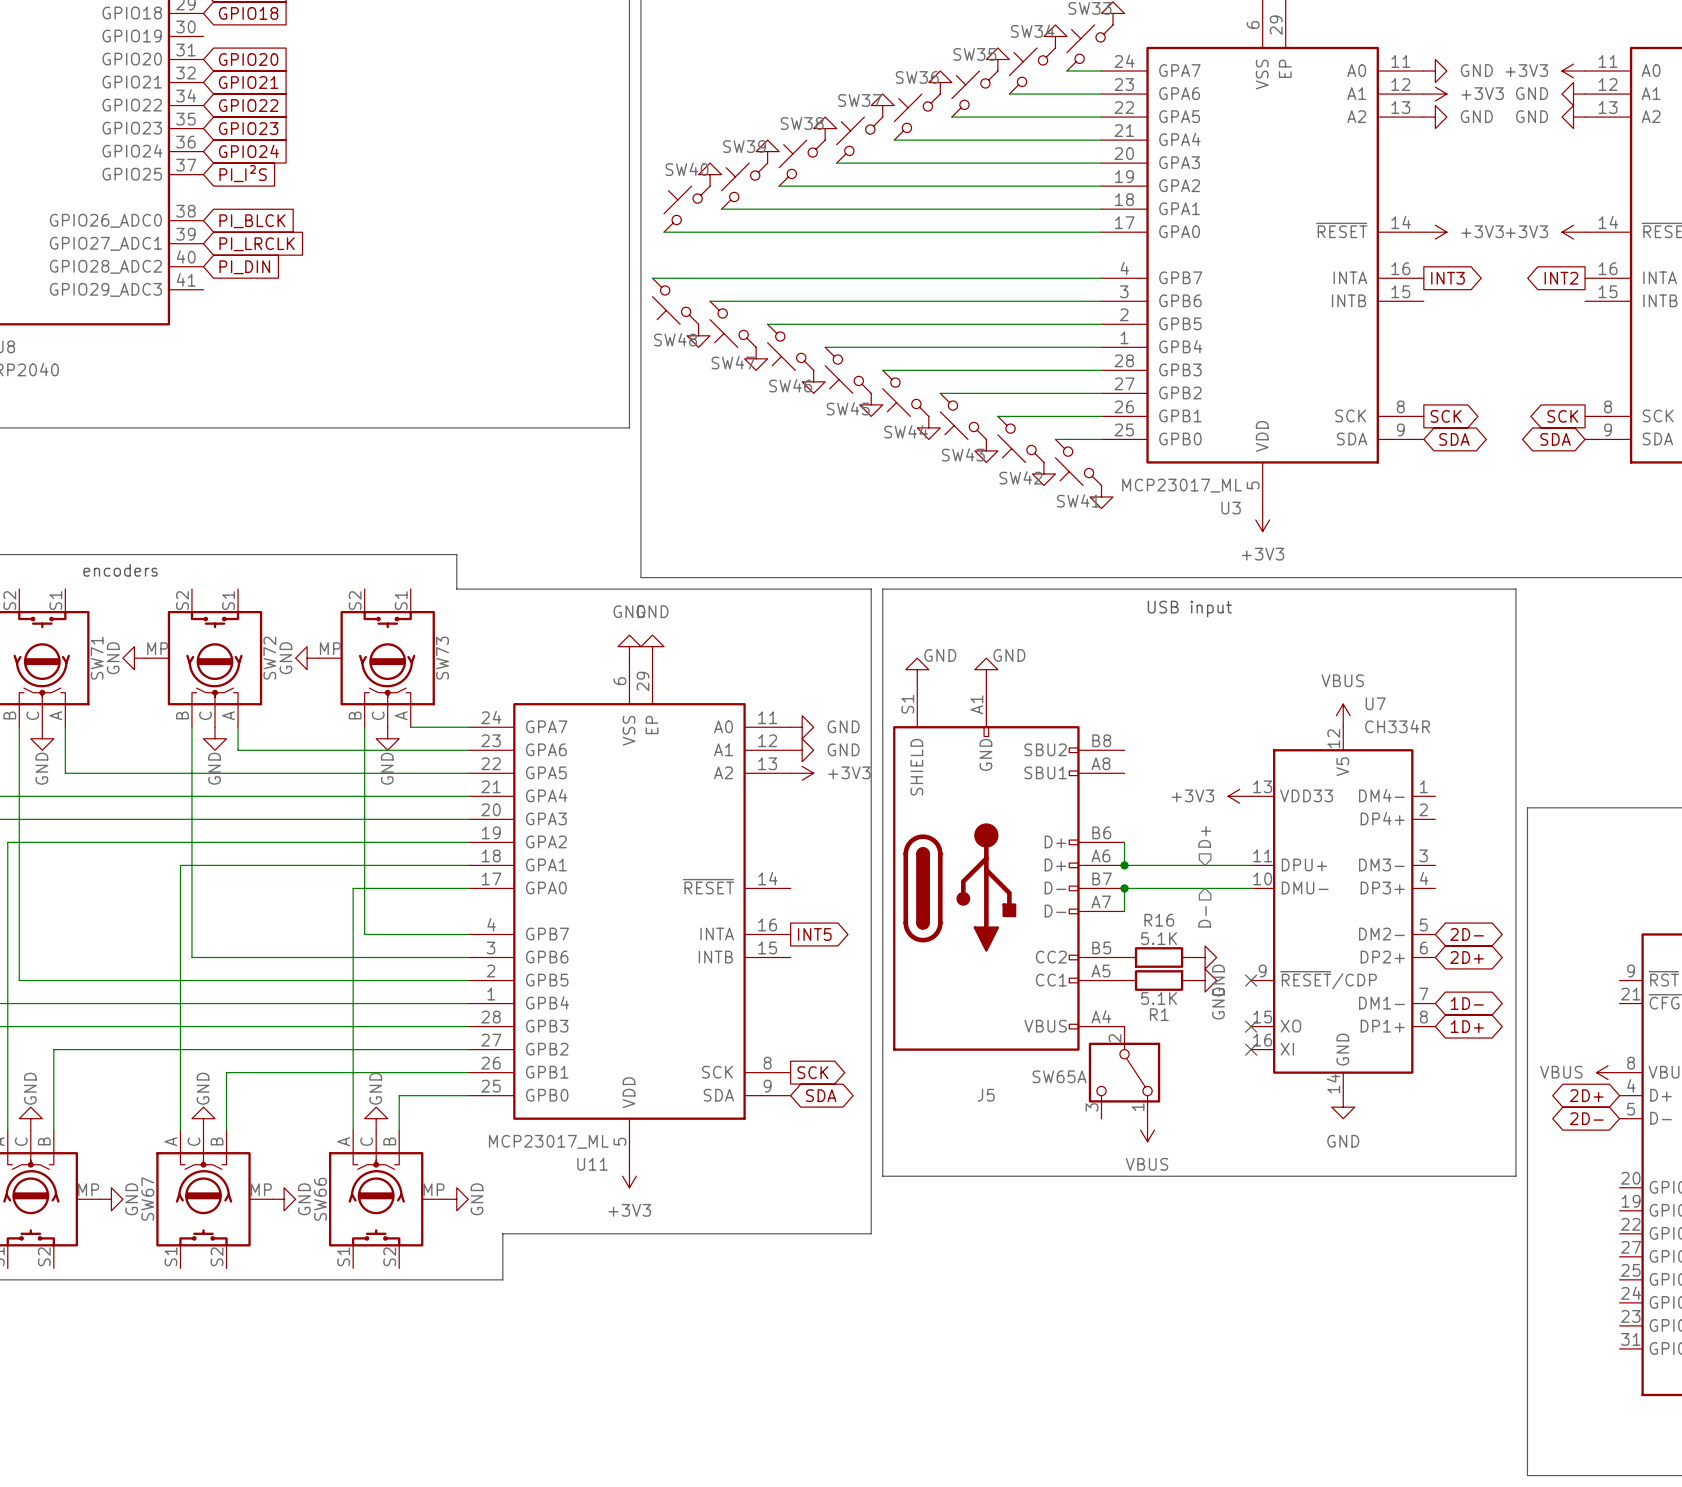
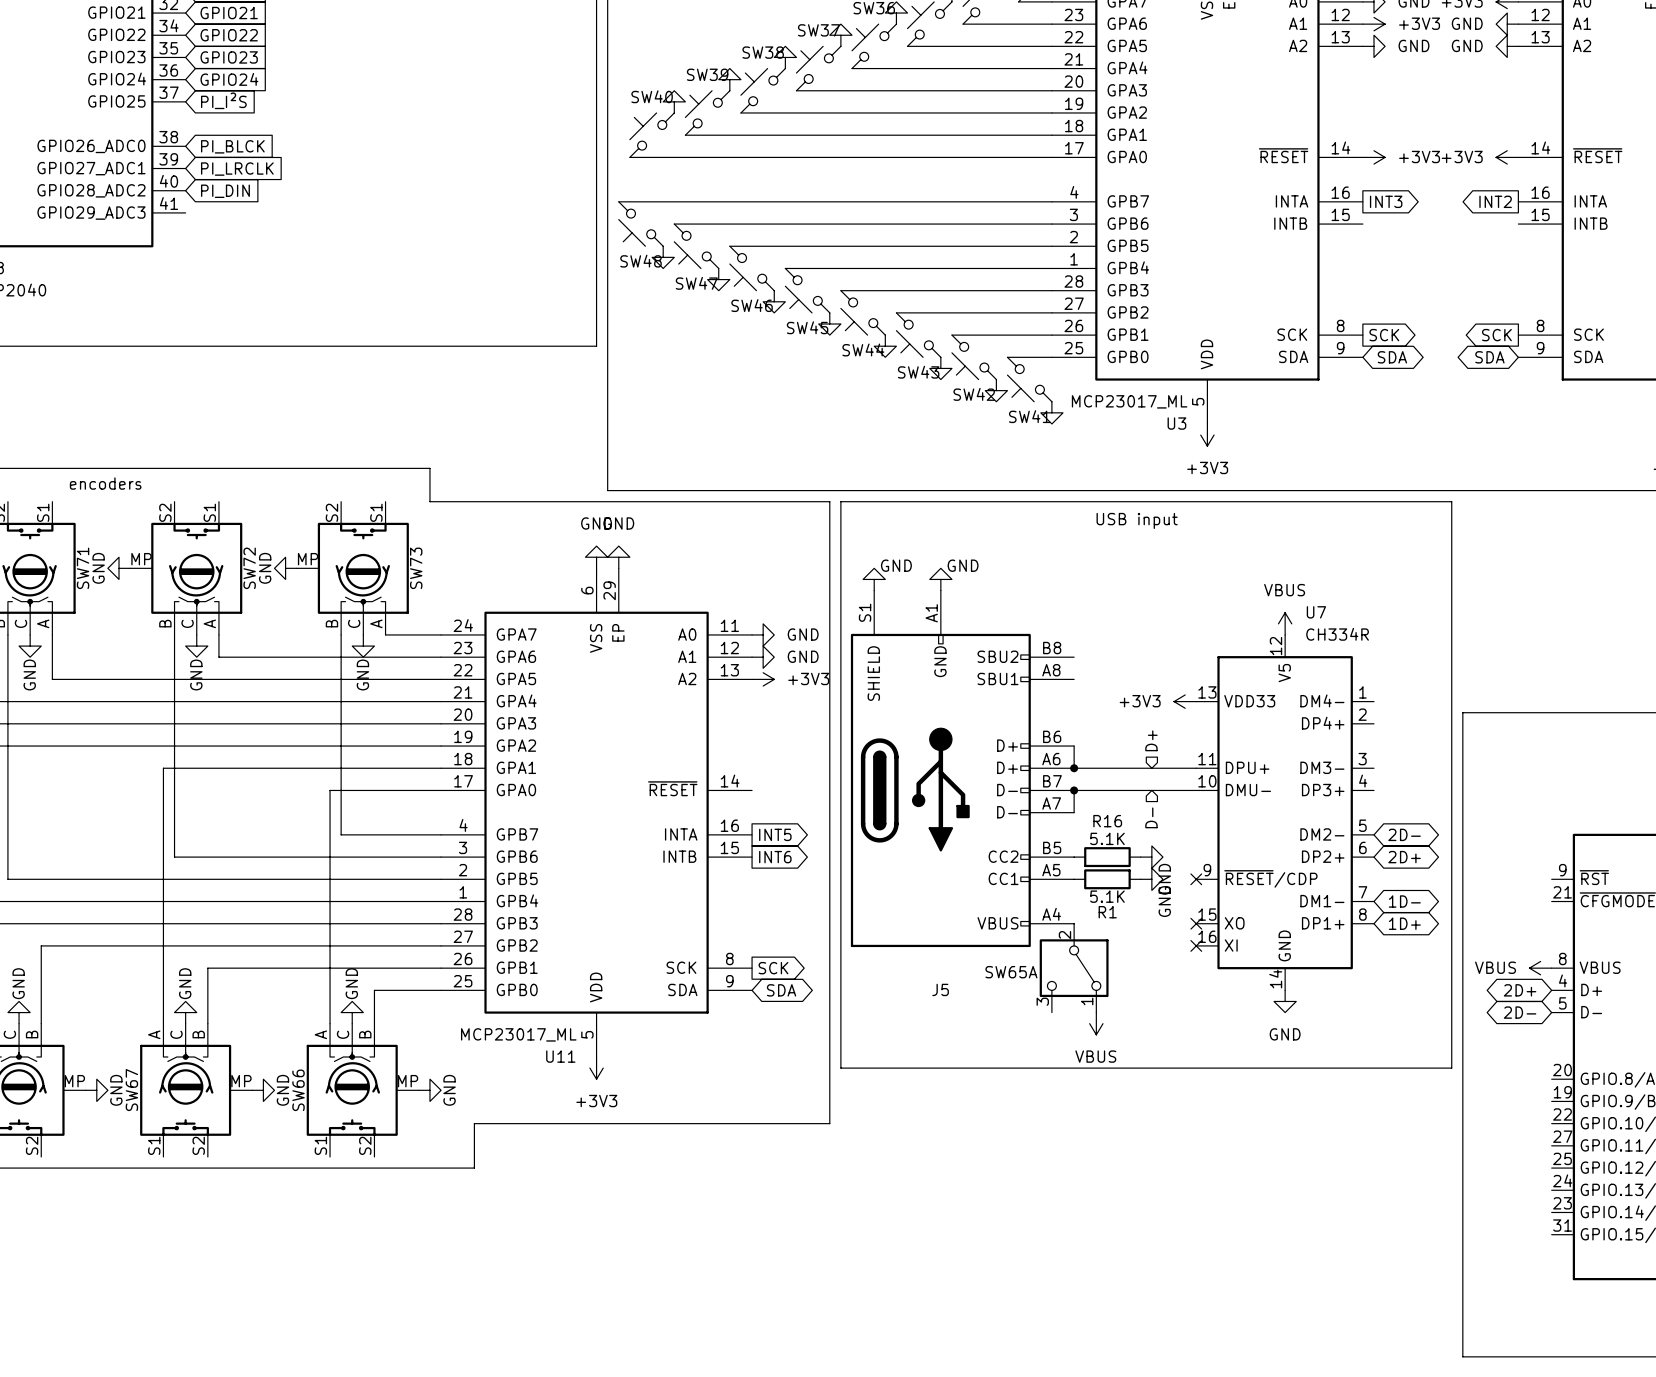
global label: none -> INT6 (775, 857)

